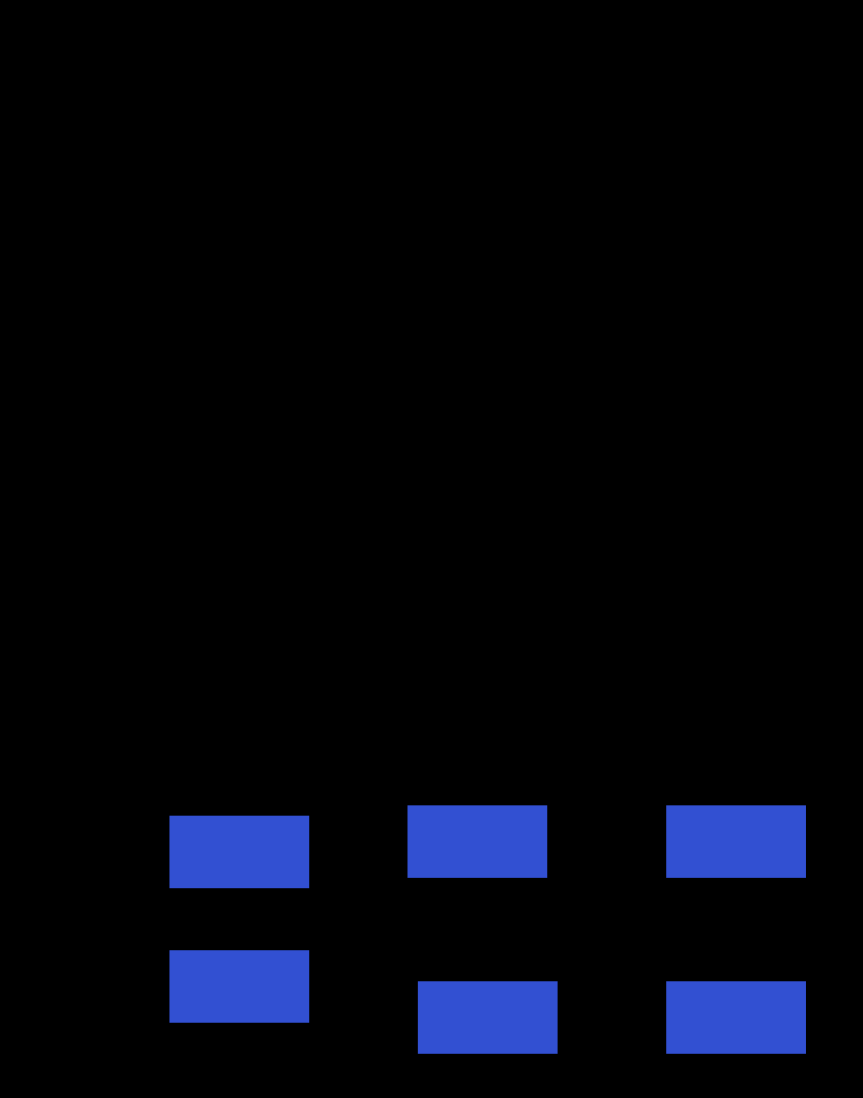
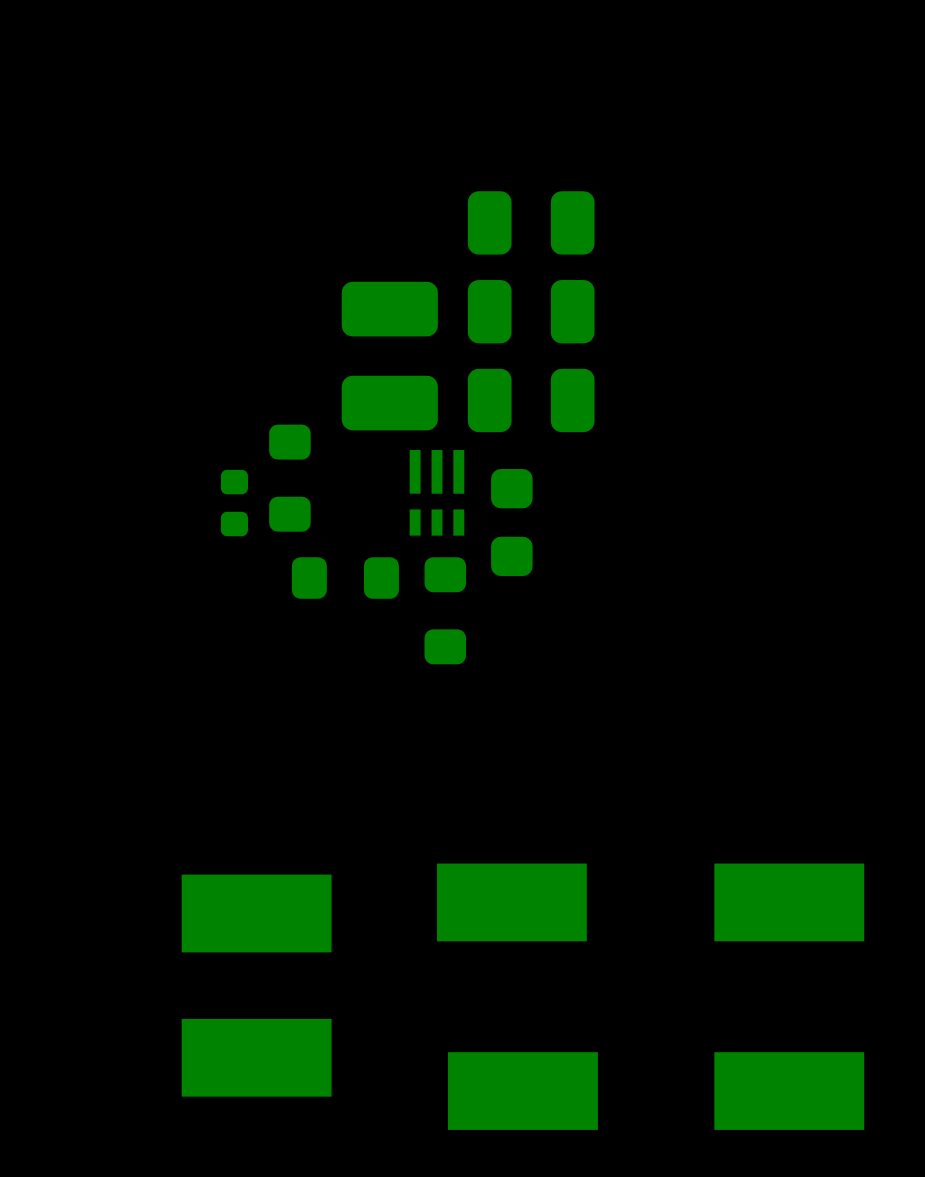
part: none -> (531, 222)
part: none -> (531, 311)
part: none -> (389, 356)
part: none -> (531, 400)
part: none -> (289, 478)
part: none -> (436, 492)
part: none -> (234, 503)
part: none -> (511, 522)
part: none -> (345, 578)
part: none -> (445, 610)

